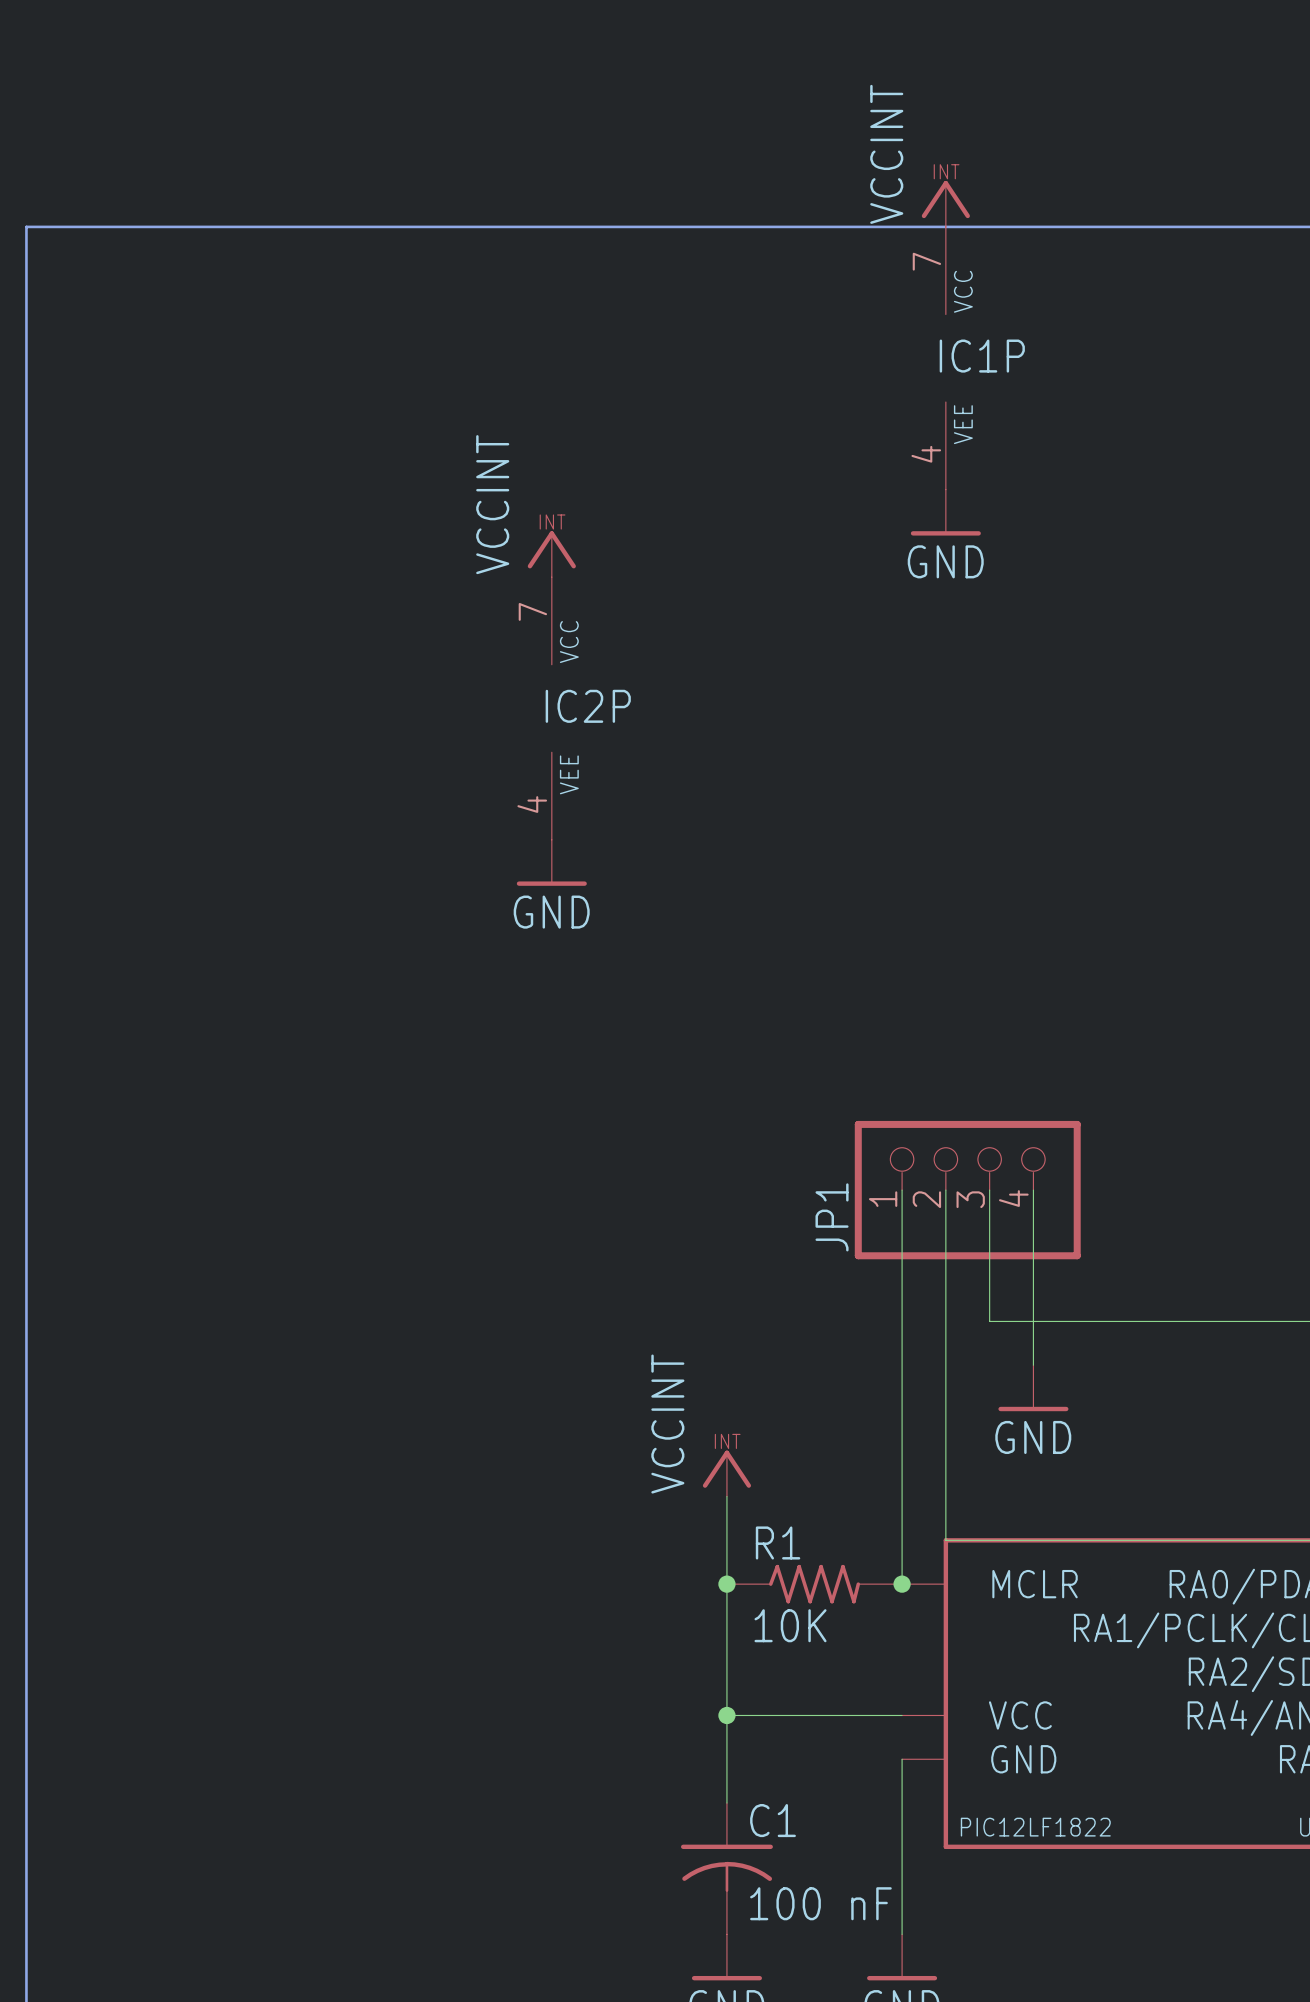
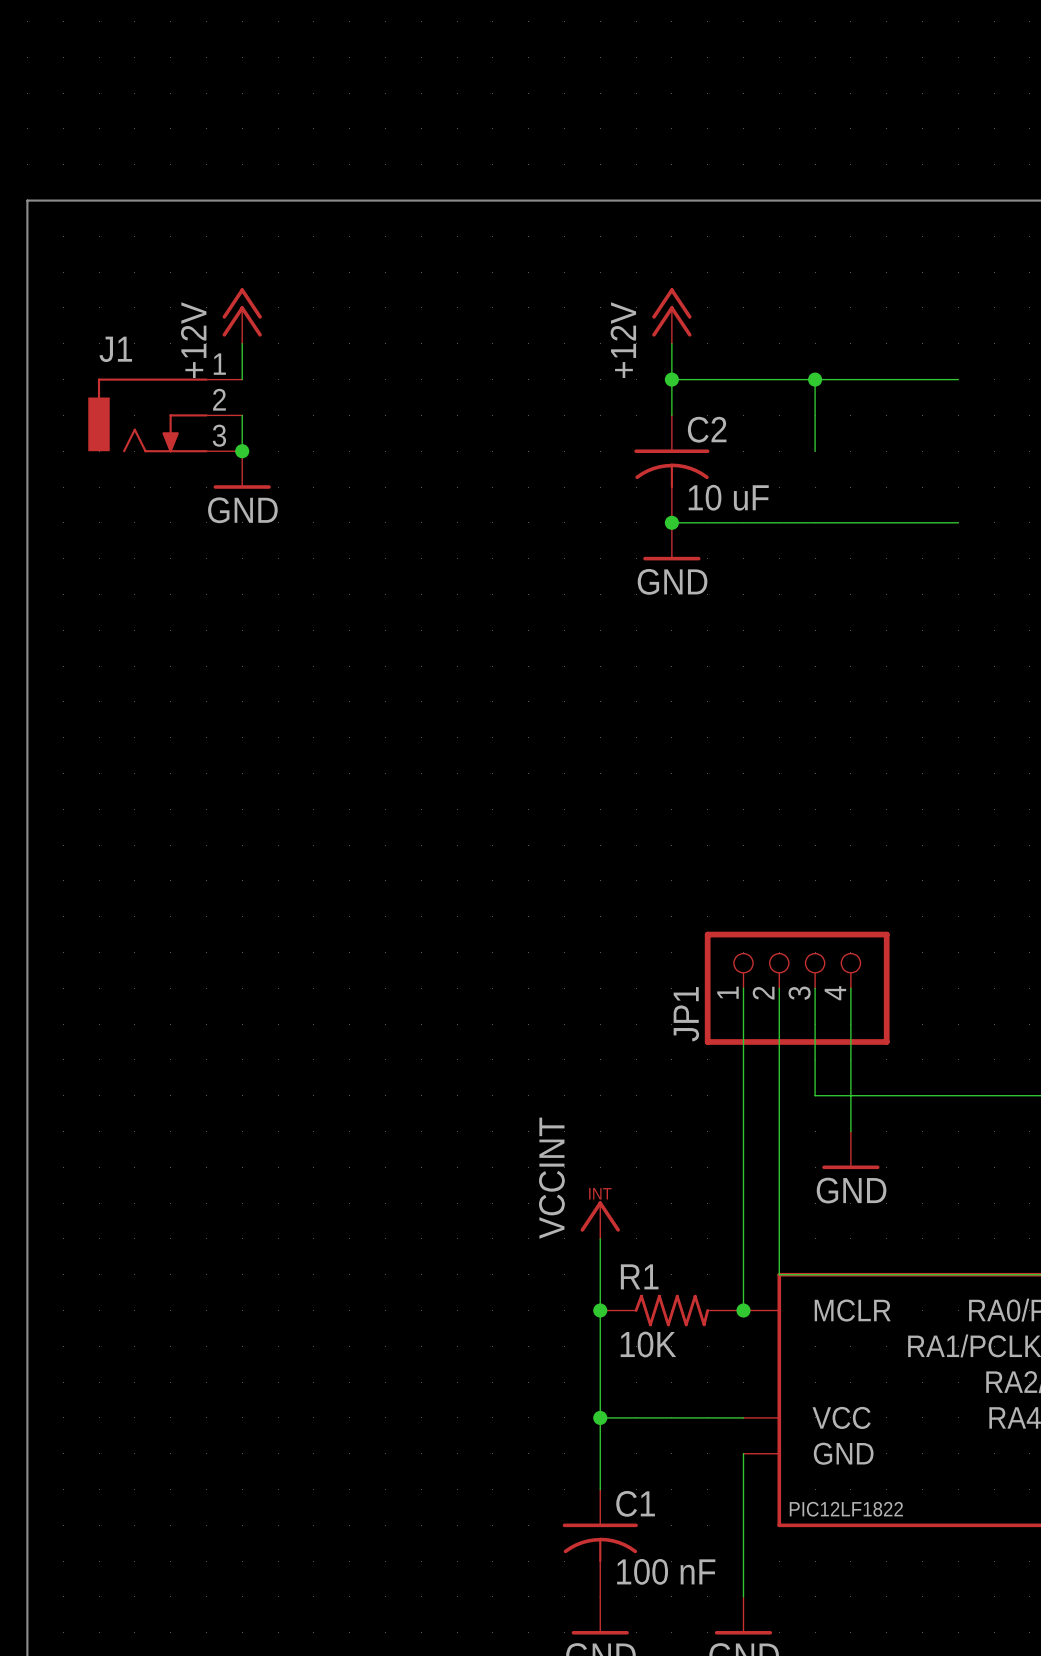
power symbol: VCCINT (945, 203) -> none
IC1P: (945, 358) -> none
power symbol: none -> +12V (242, 316)
power symbol: none -> +12V (671, 316)
wire: none -> (242, 343) (242, 379)
wire: none -> (671, 343) (671, 415)
wire: none -> (671, 379) (958, 379)
junction: none -> (671, 379)
wire: none -> (815, 379) (815, 451)
junction: none -> (815, 379)
J1: none -> (165, 415)
wire: none -> (242, 415) (242, 451)
power symbol: GND (945, 512) -> none
junction: none -> (242, 451)
power symbol: VCCINT (551, 554) -> none
C2: none -> 10 uF (671, 469)
power symbol: none -> GND (242, 470)
wire: none -> (671, 522) (958, 522)
junction: none -> (671, 522)
power symbol: none -> GND (671, 541)
IC2P: (551, 708) -> none
power symbol: GND (551, 862) -> none

